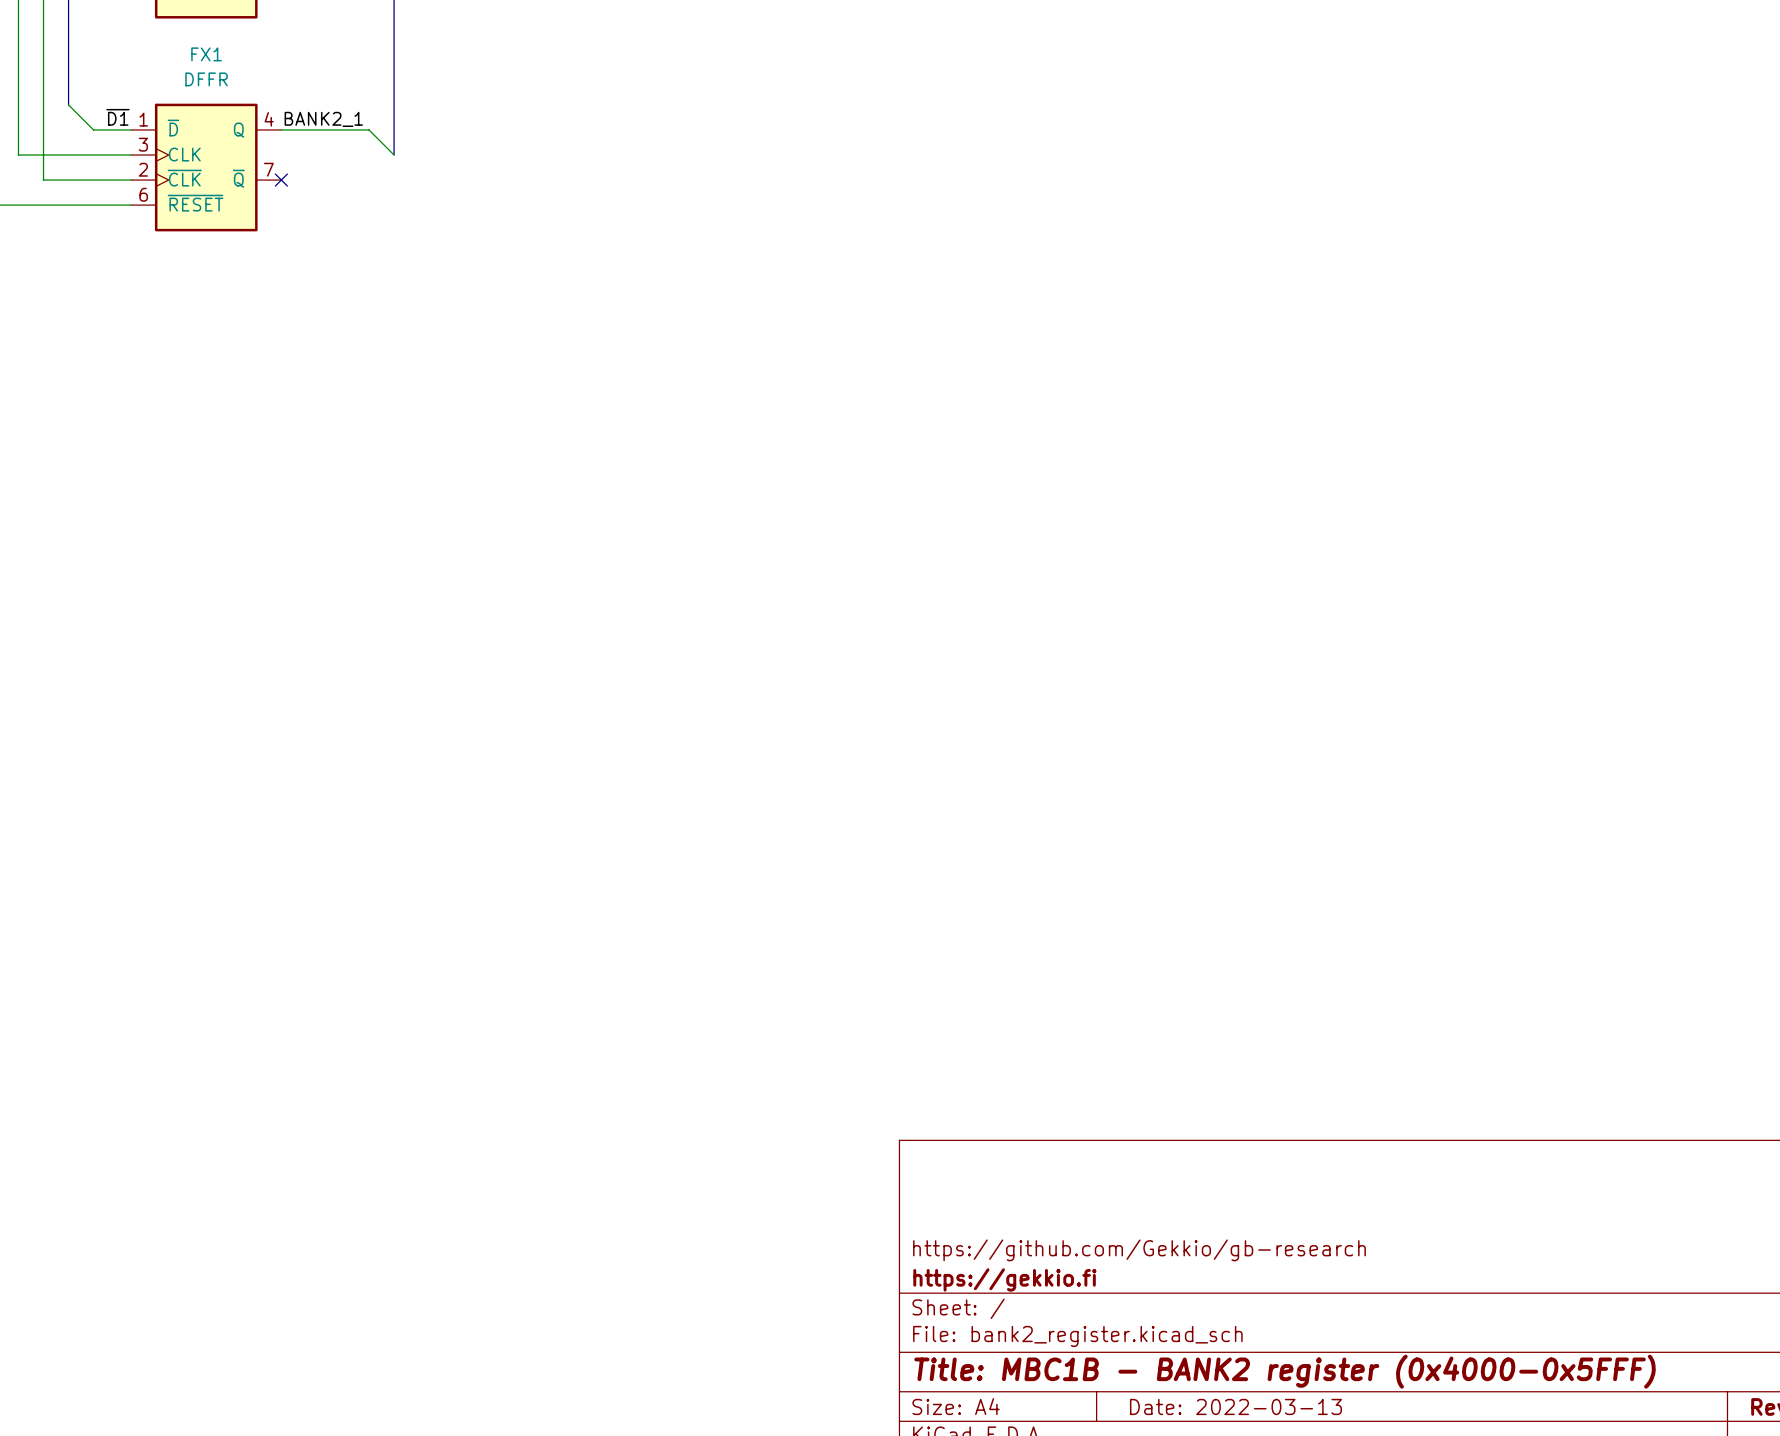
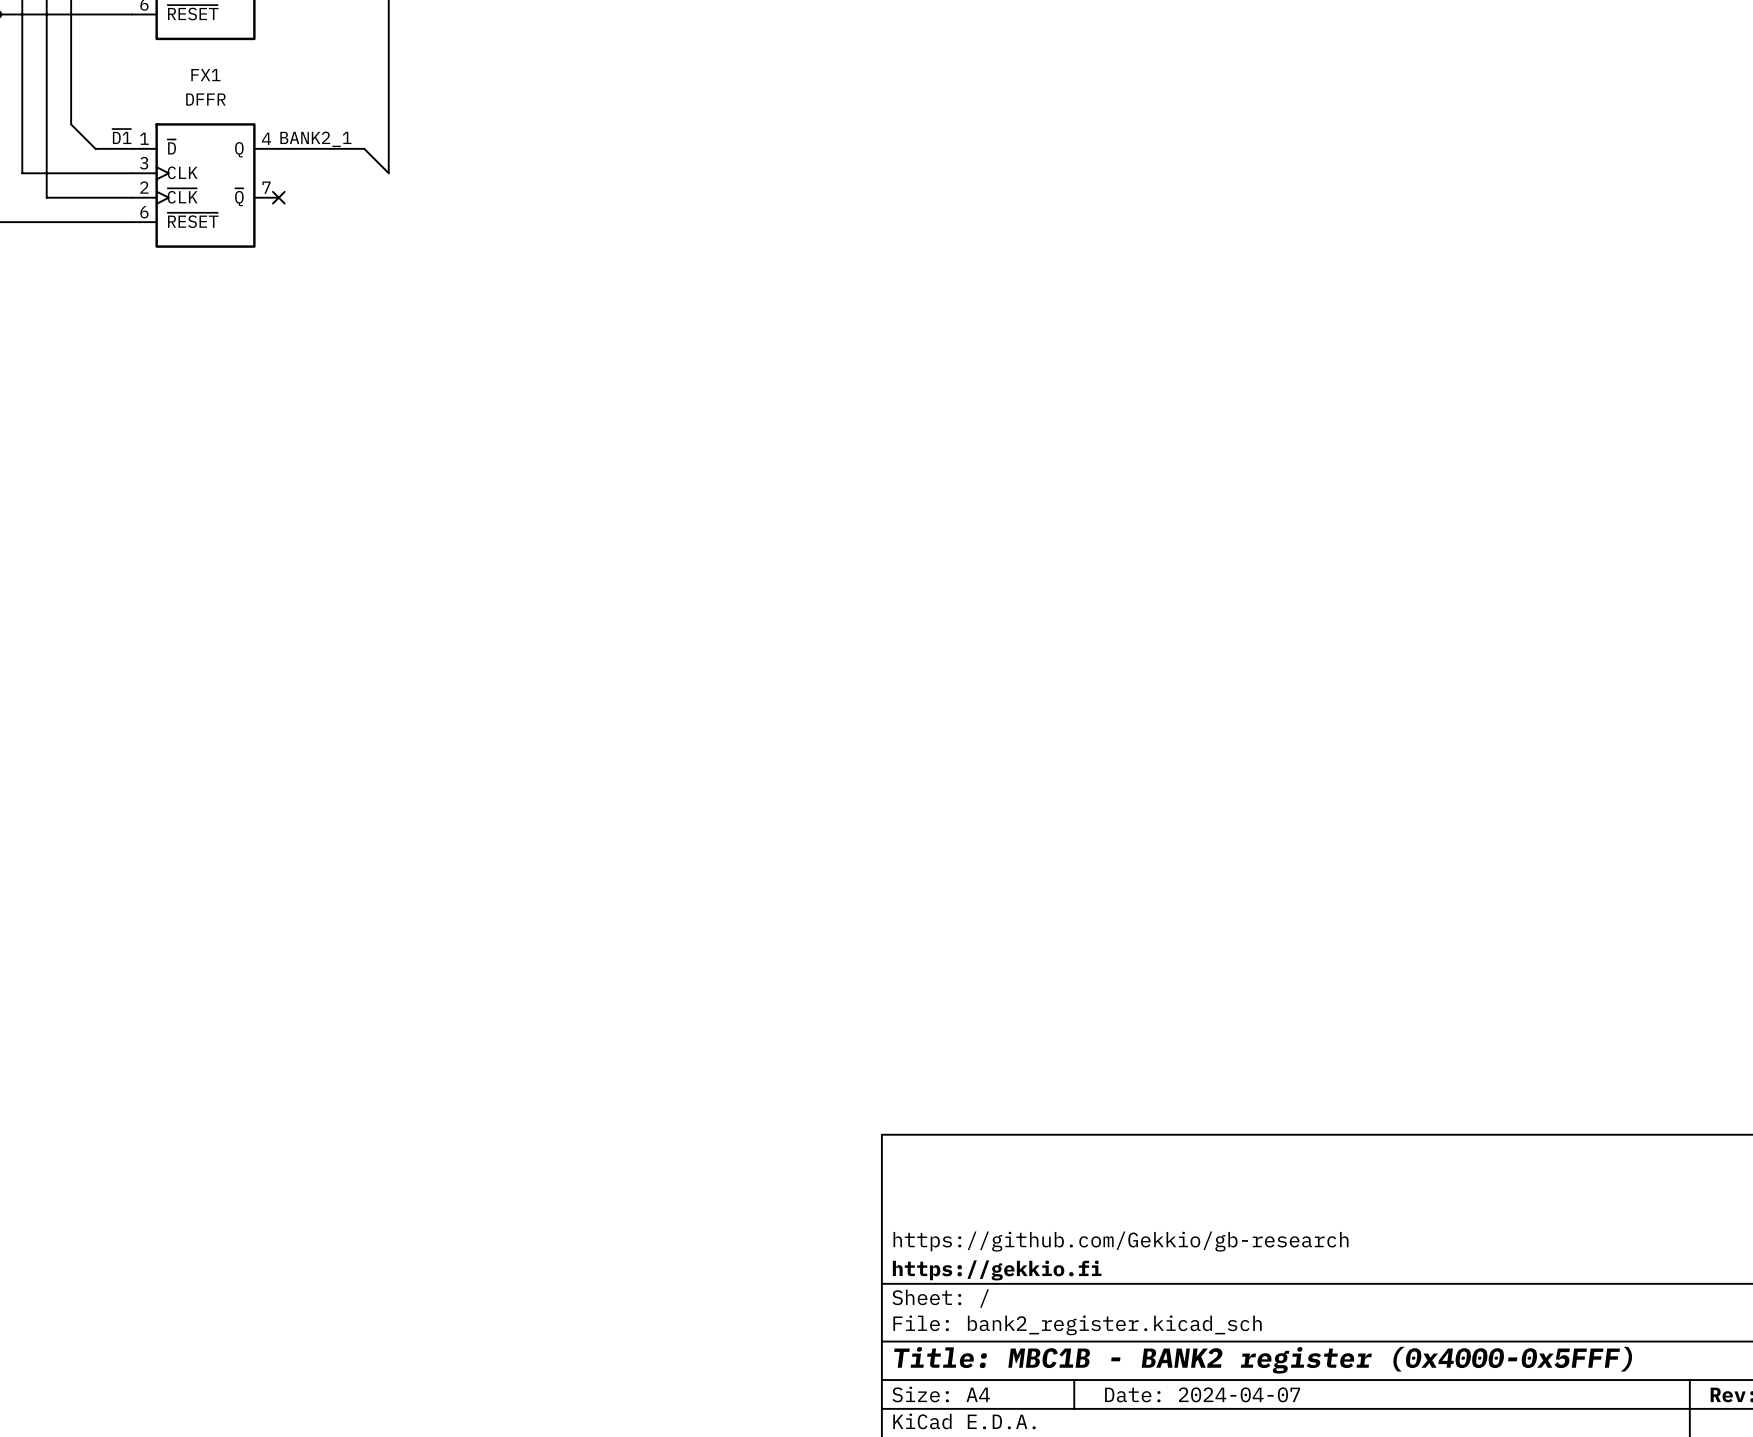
title block: Date: 2022-03-13 (1235, 1406) -> Date: 2024-04-07 (1202, 1394)

